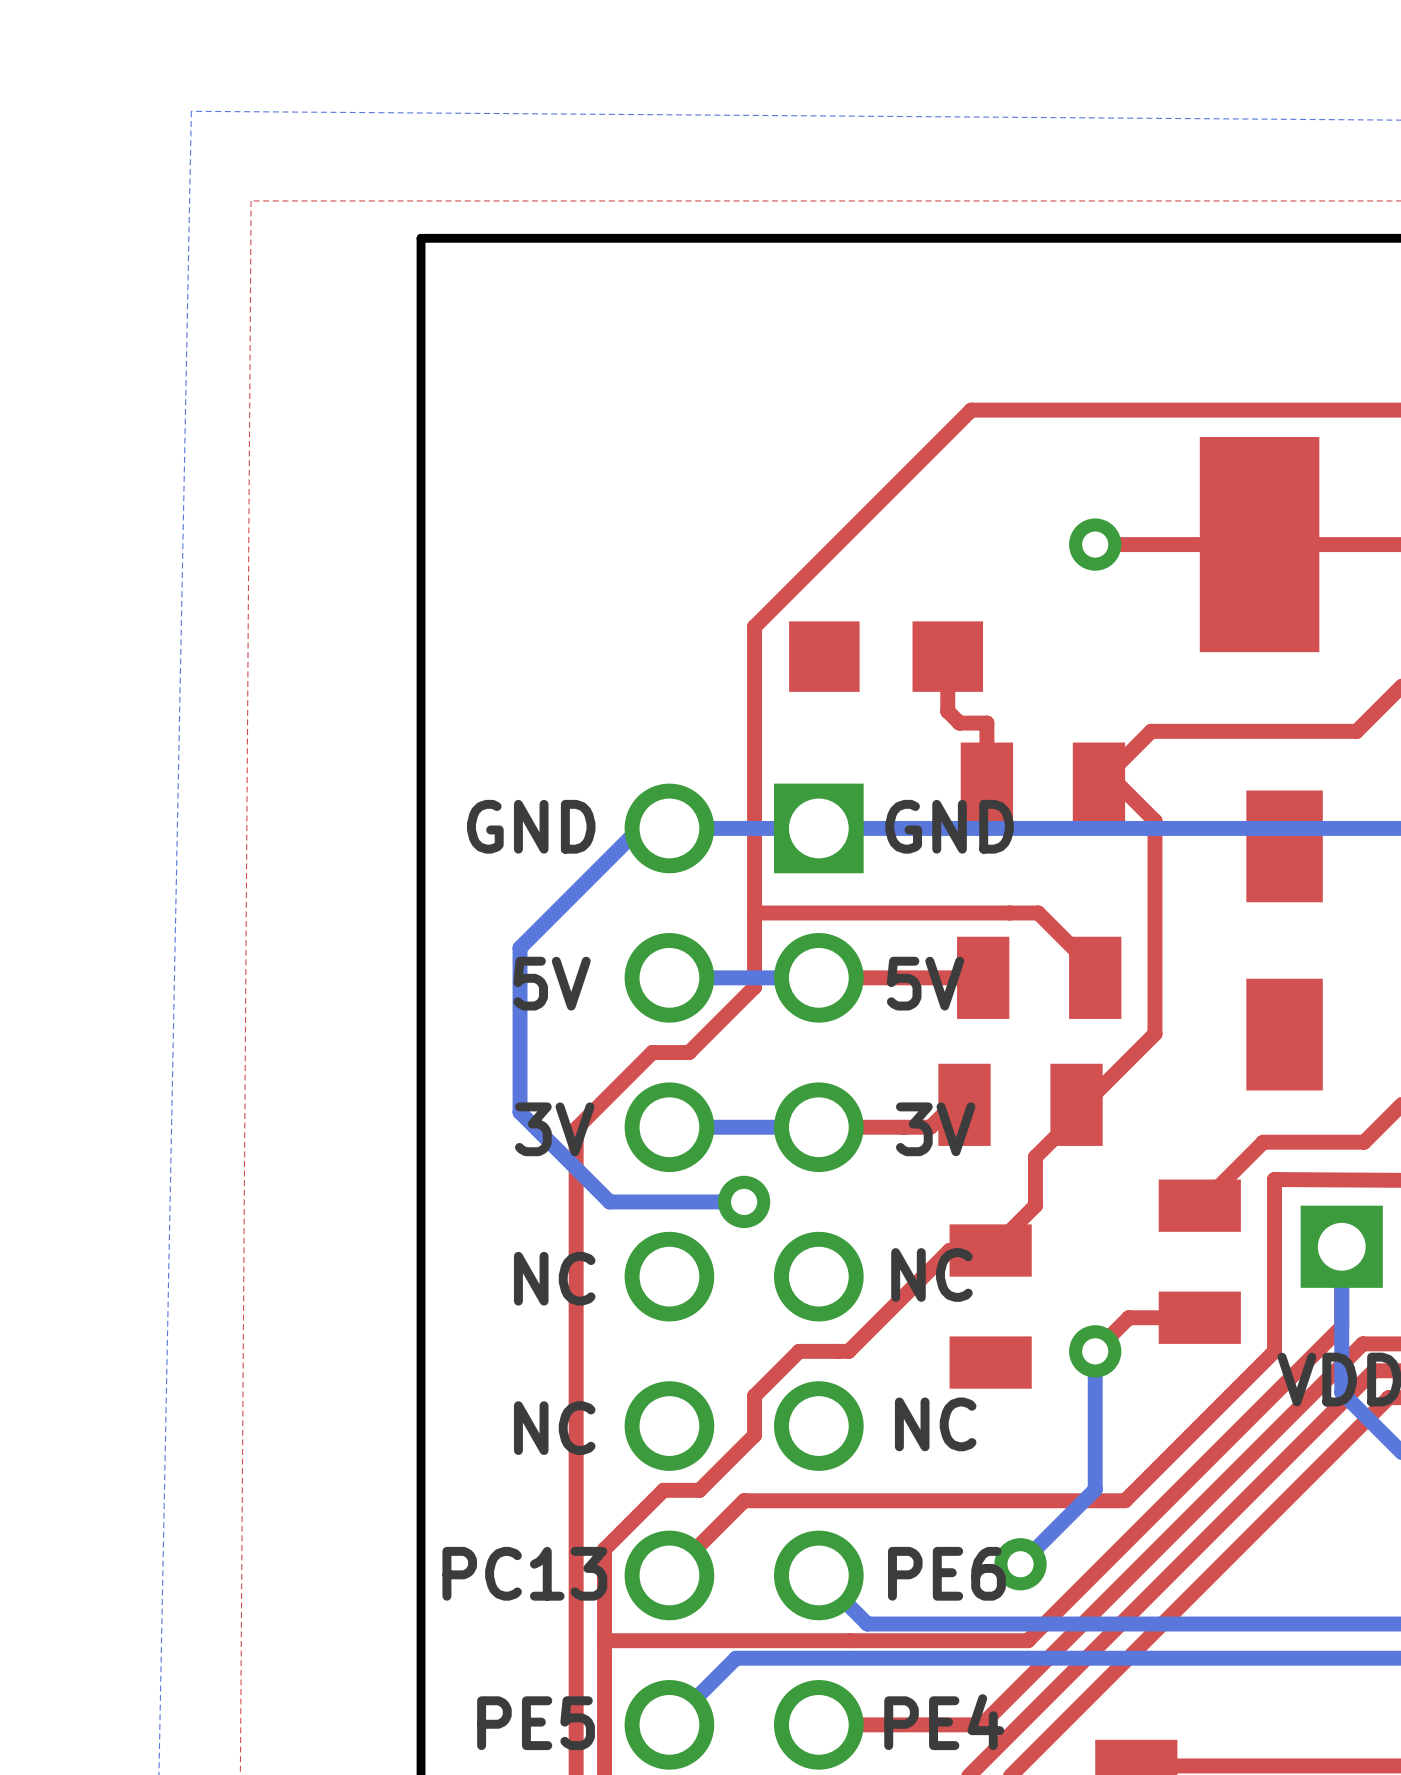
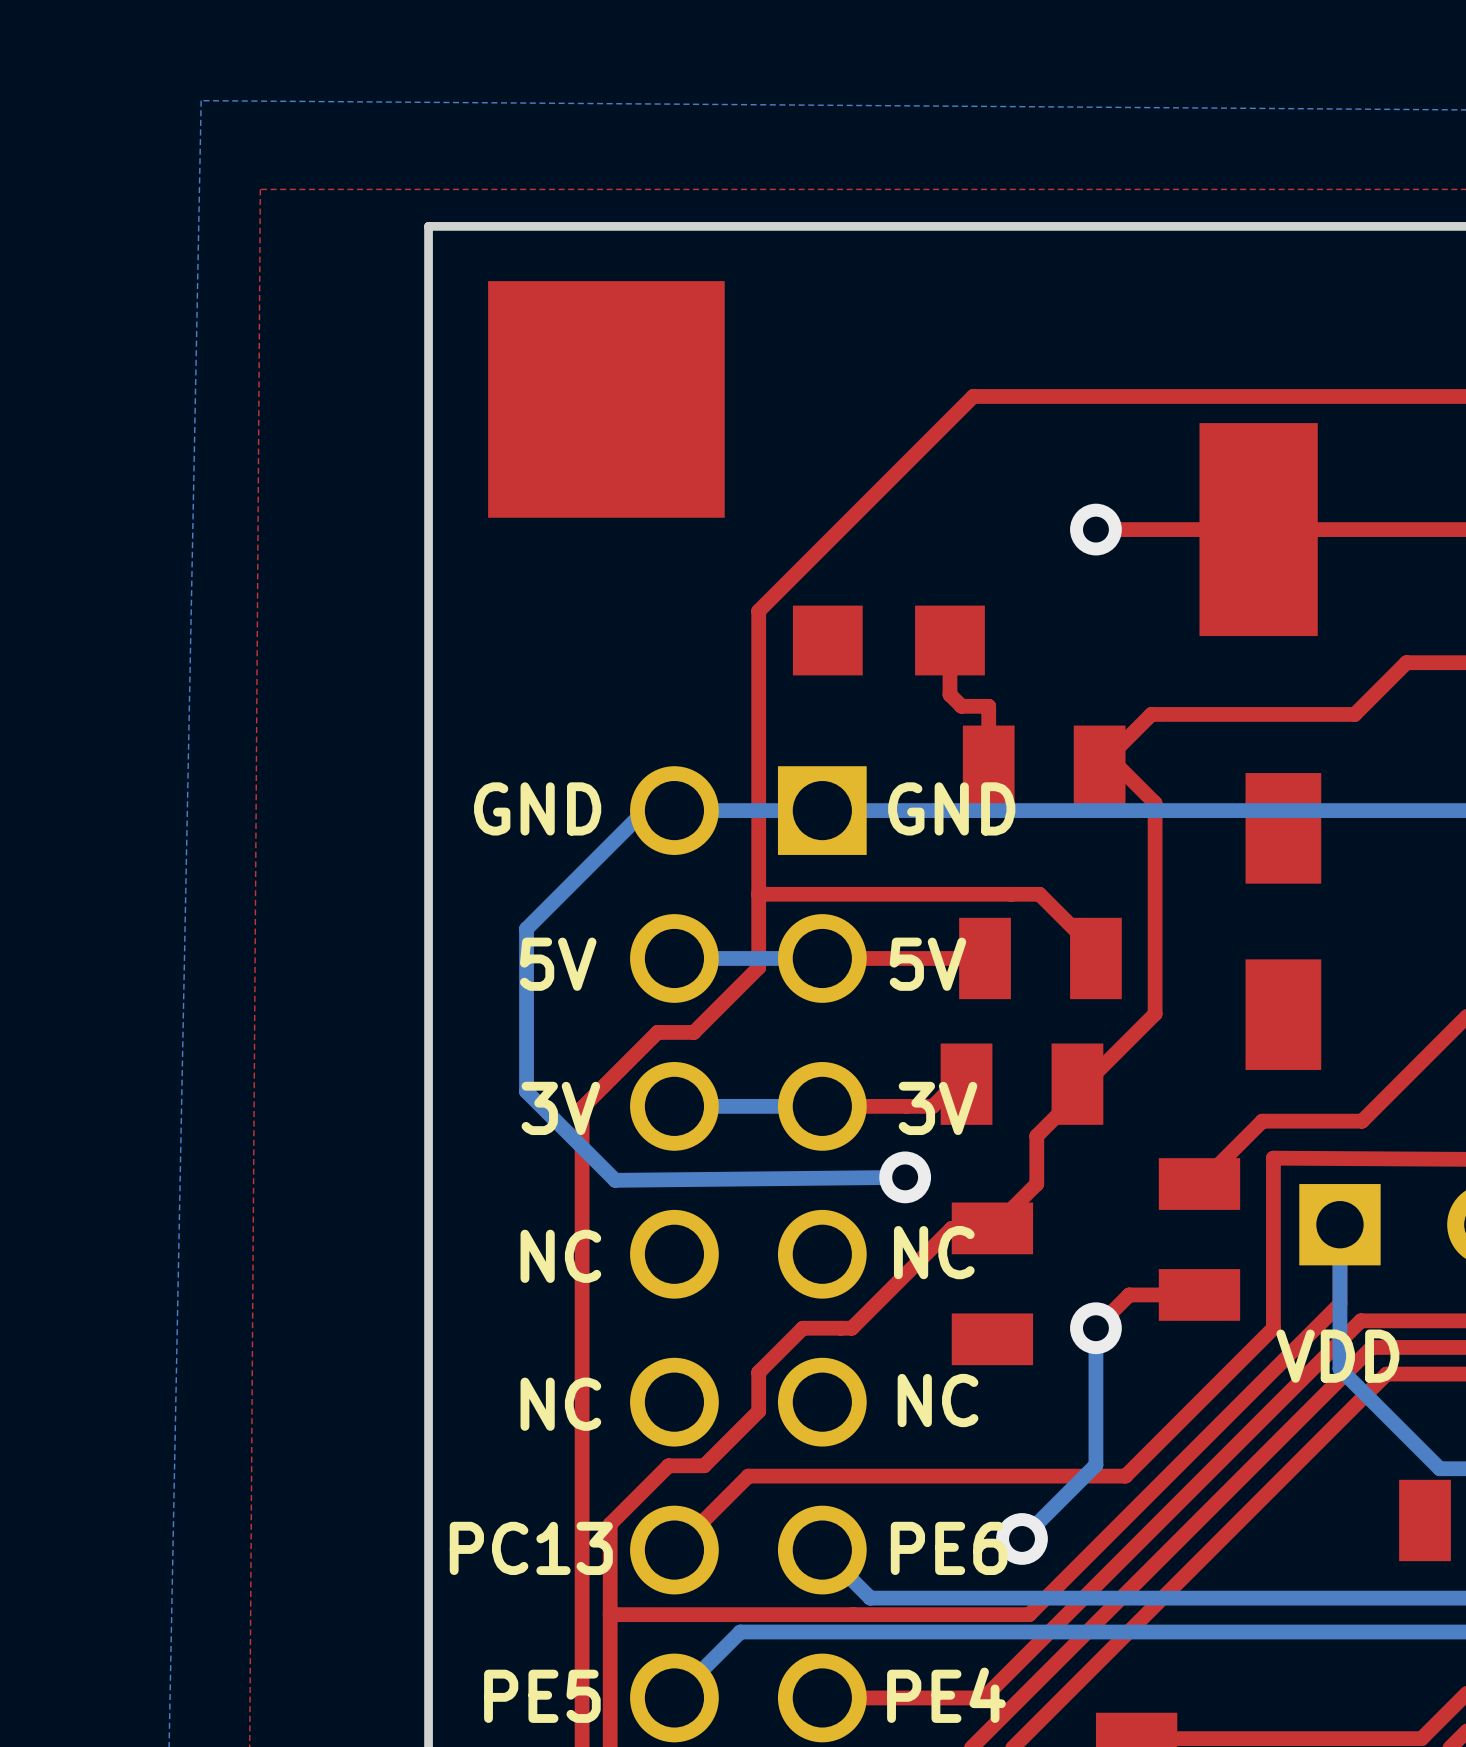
part: none -> (606, 399)
bottom track: (744, 1201) (609, 1201) -> (905, 1177) (615, 1180)
via position: (744, 1201) -> (905, 1177)

